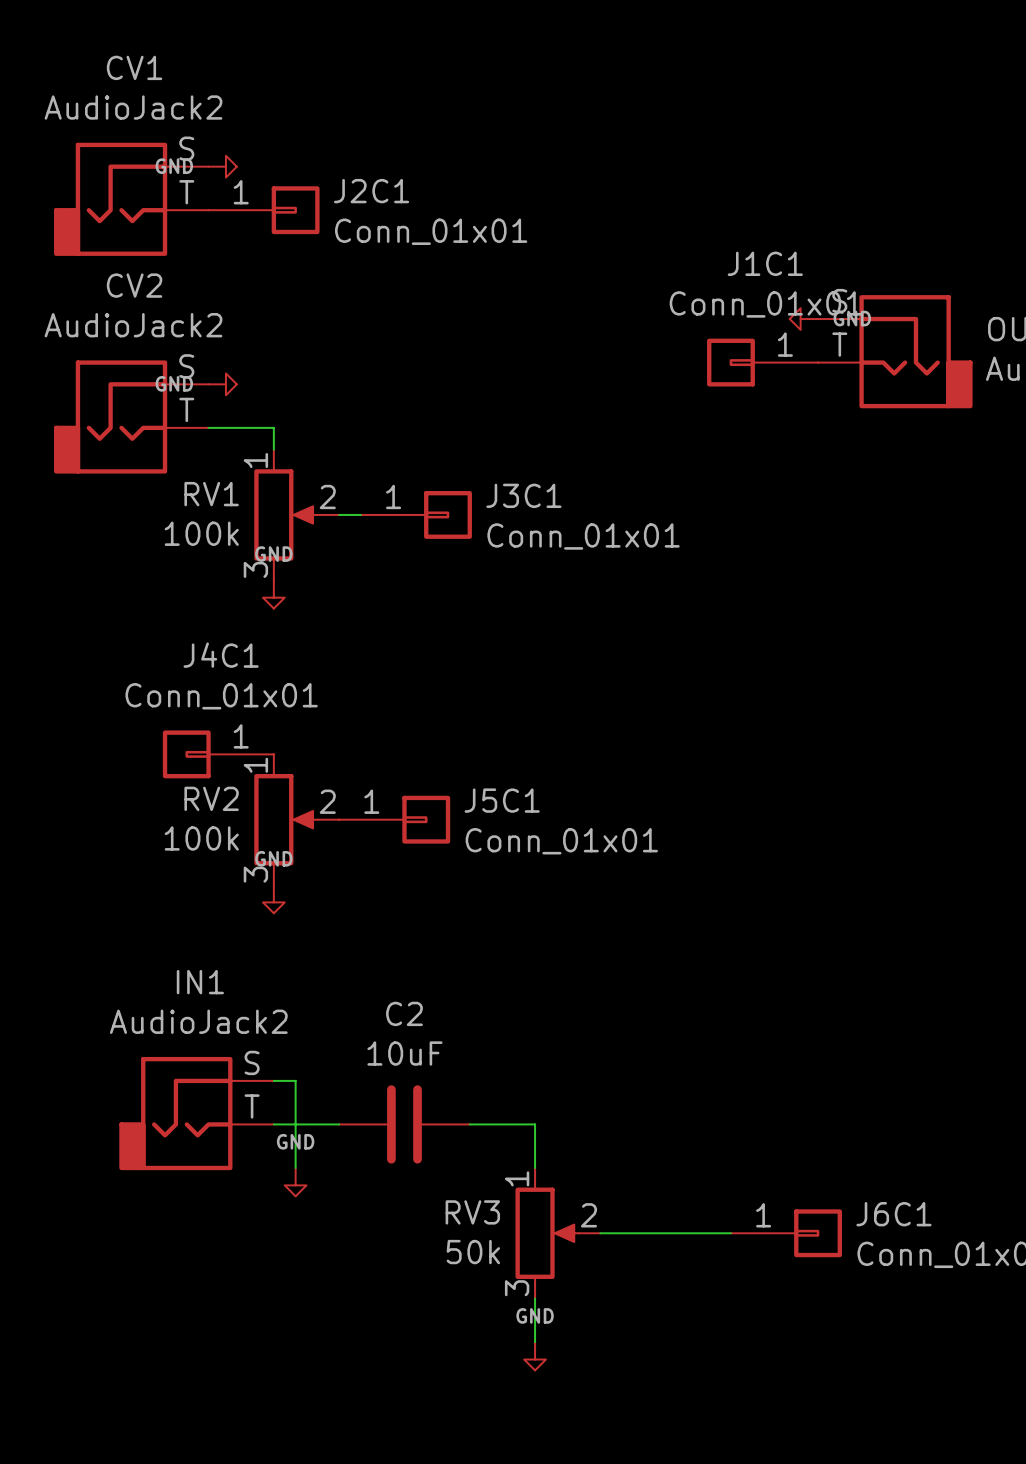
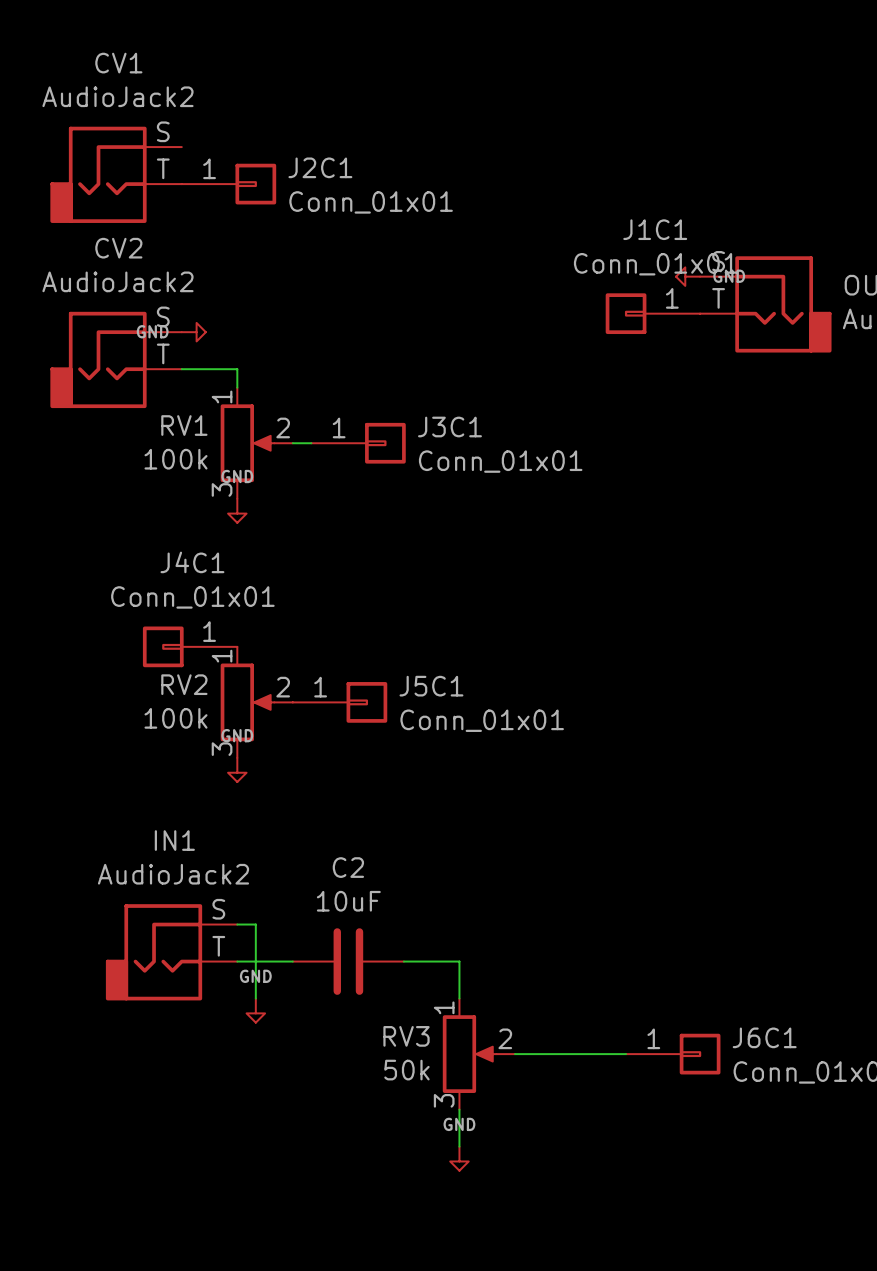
power symbol: GND (222, 166) -> none

